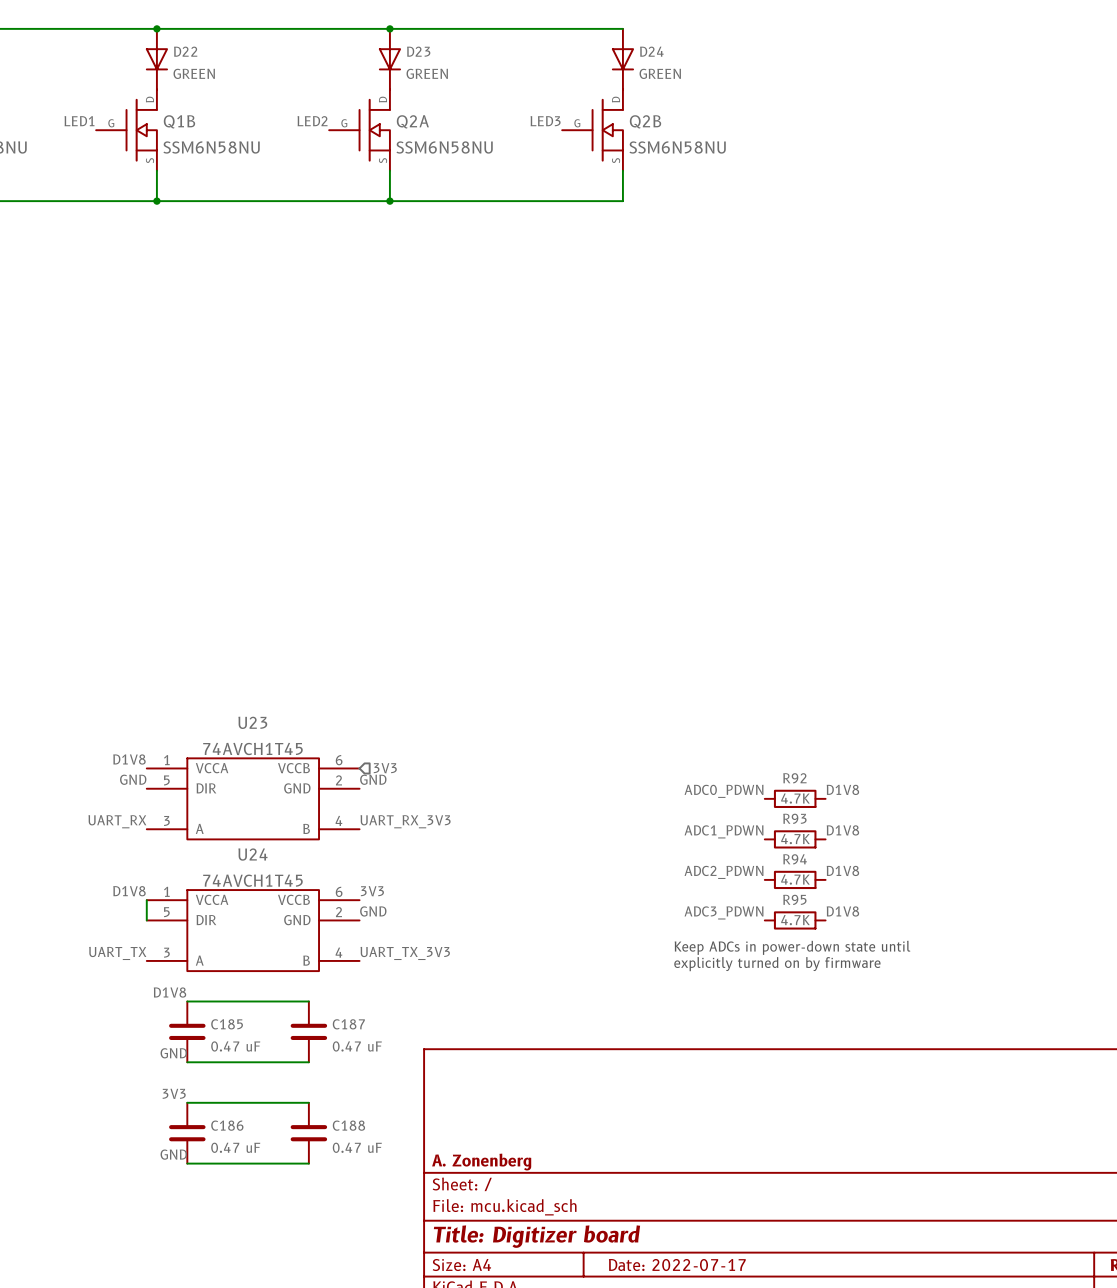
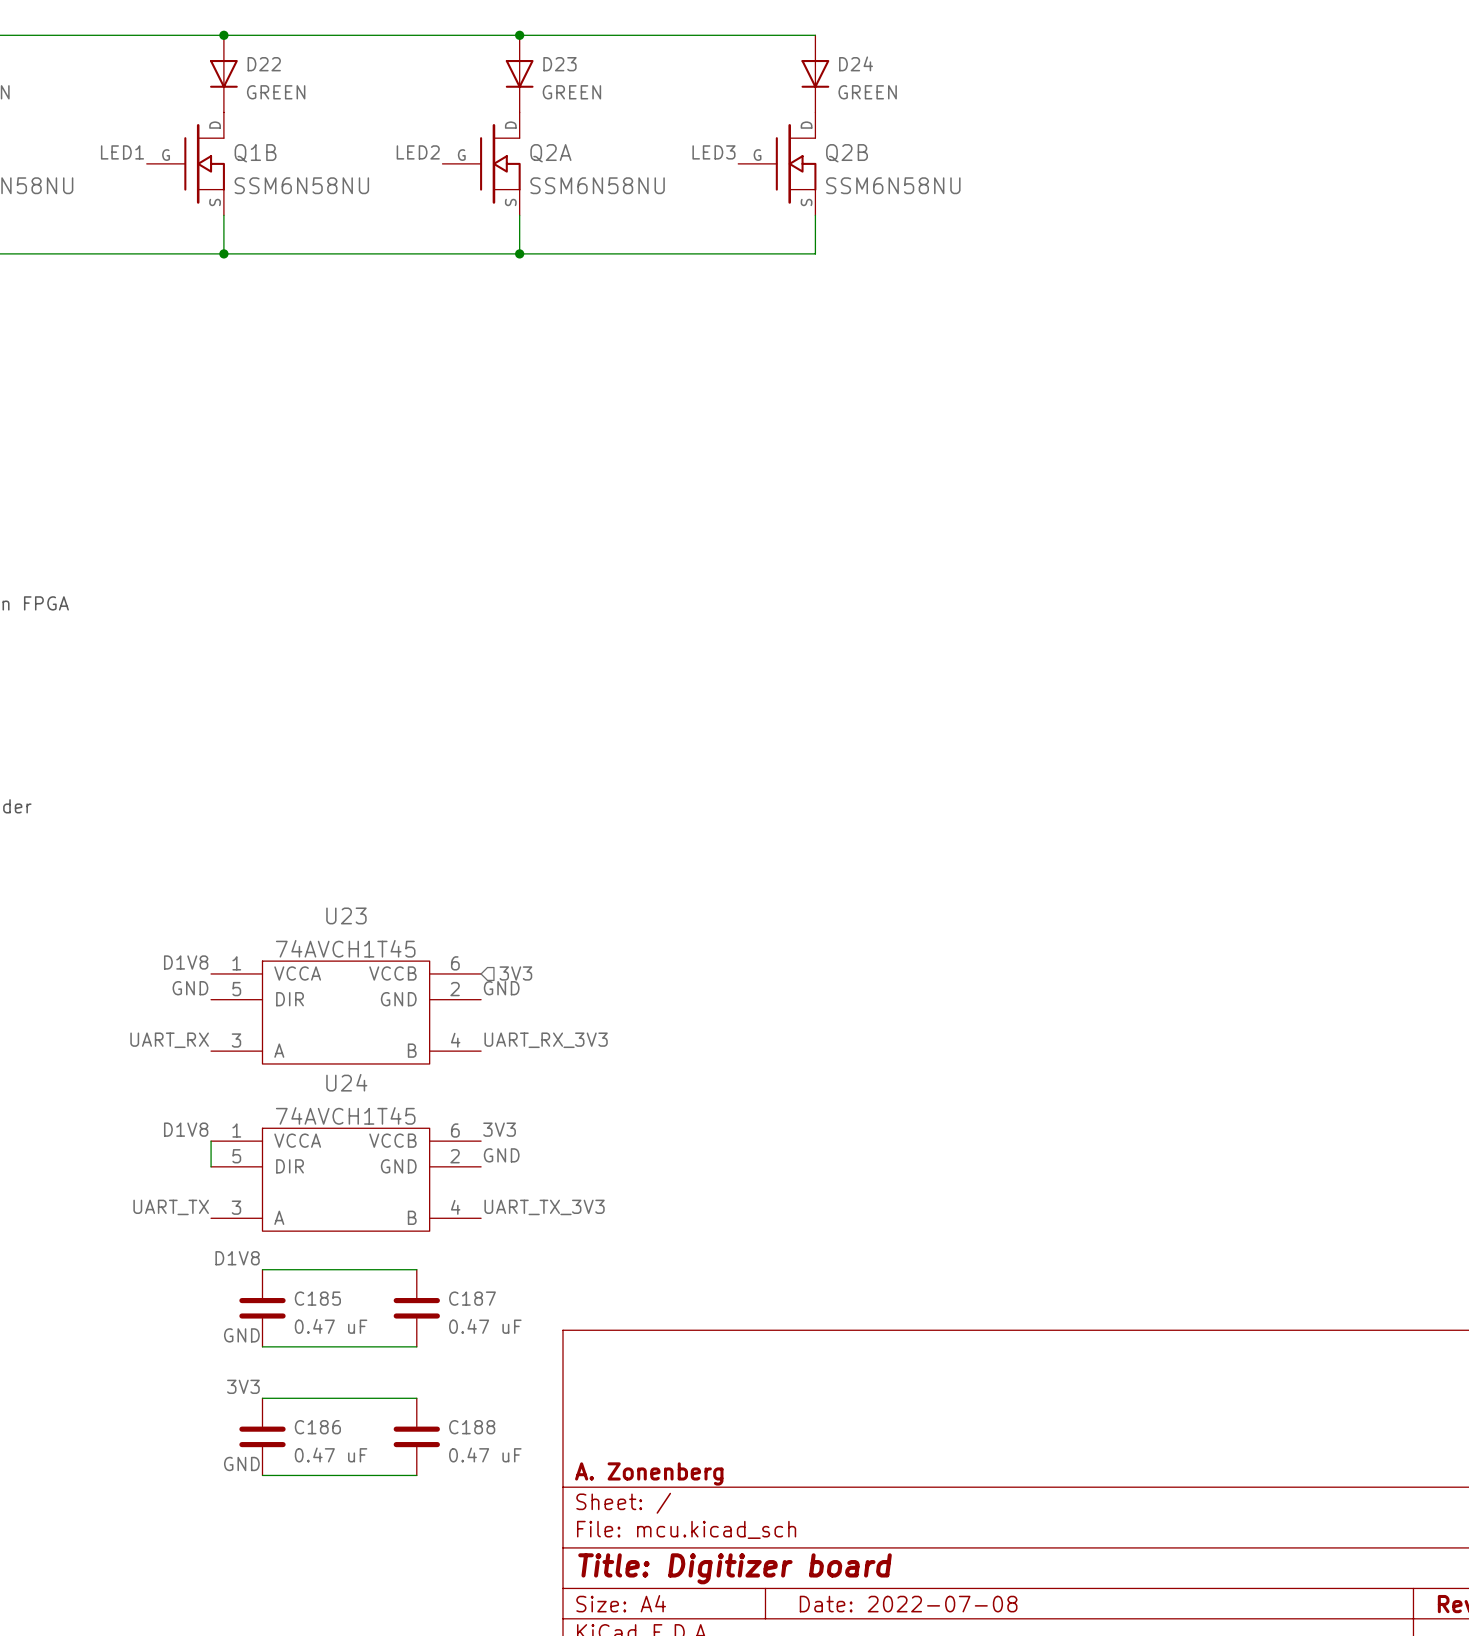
label: D1V8 (842, 789) -> none
label: ADC0_PDWN (723, 791) -> none
R92: 4.7K (795, 798) -> none
label: D1V8 (842, 830) -> none
label: ADC1_PDWN (723, 831) -> none
R93: 4.7K (795, 839) -> none
label: D1V8 (842, 870) -> none
label: ADC2_PDWN (723, 872) -> none
R94: 4.7K (795, 879) -> none
label: D1V8 (842, 911) -> none
label: ADC3_PDWN (723, 912) -> none
R95: 4.7K (795, 920) -> none
text: Keep ADCs in power-down state until (792, 947) -> none
text: explicitly turned on by firmware (777, 964) -> none
title block: Date: 2022-07-17 (677, 1265) -> Date: 2022-07-08 (908, 1604)

